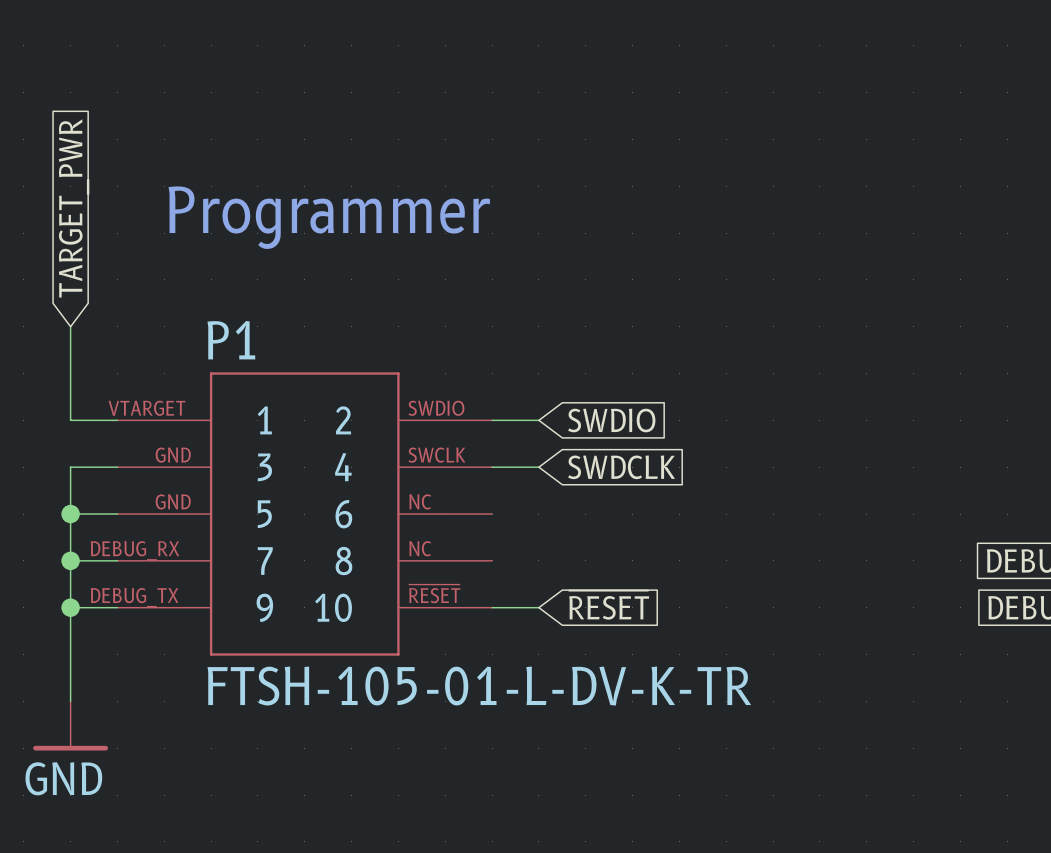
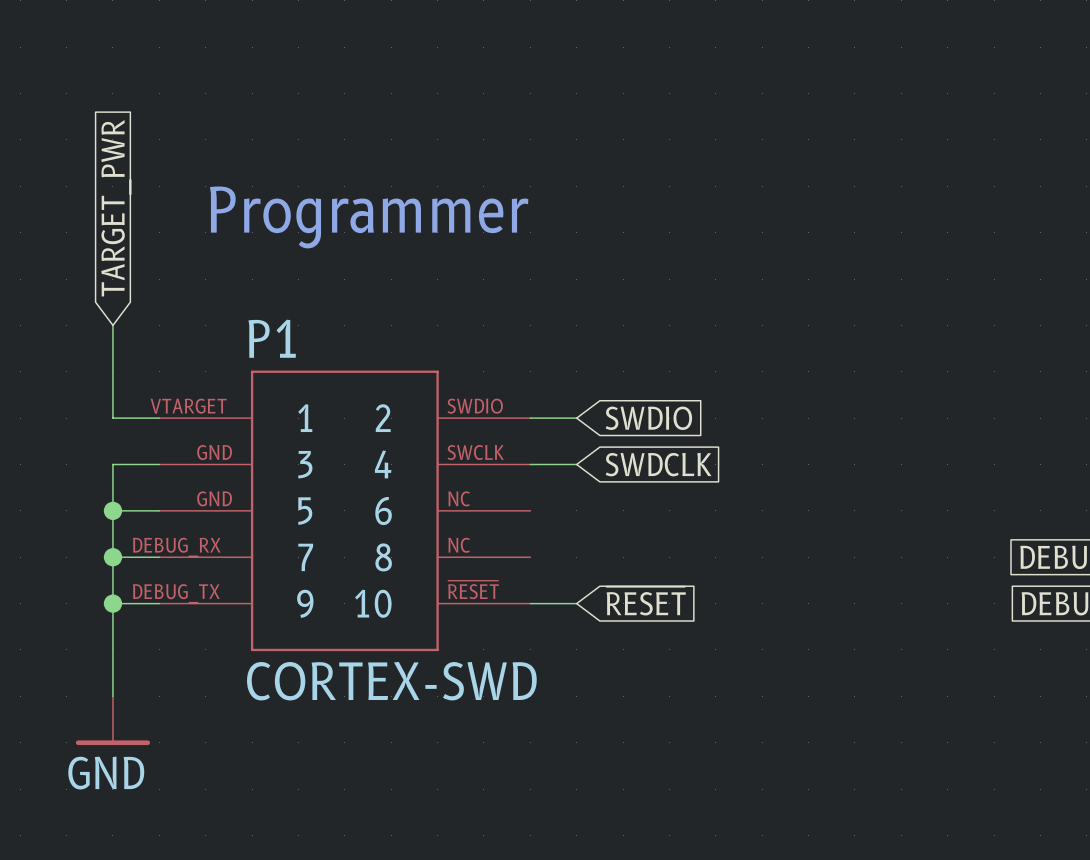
P1 value: FTSH-105-01-L-DV-K-TR (479, 686) -> CORTEX-SWD (391, 681)

